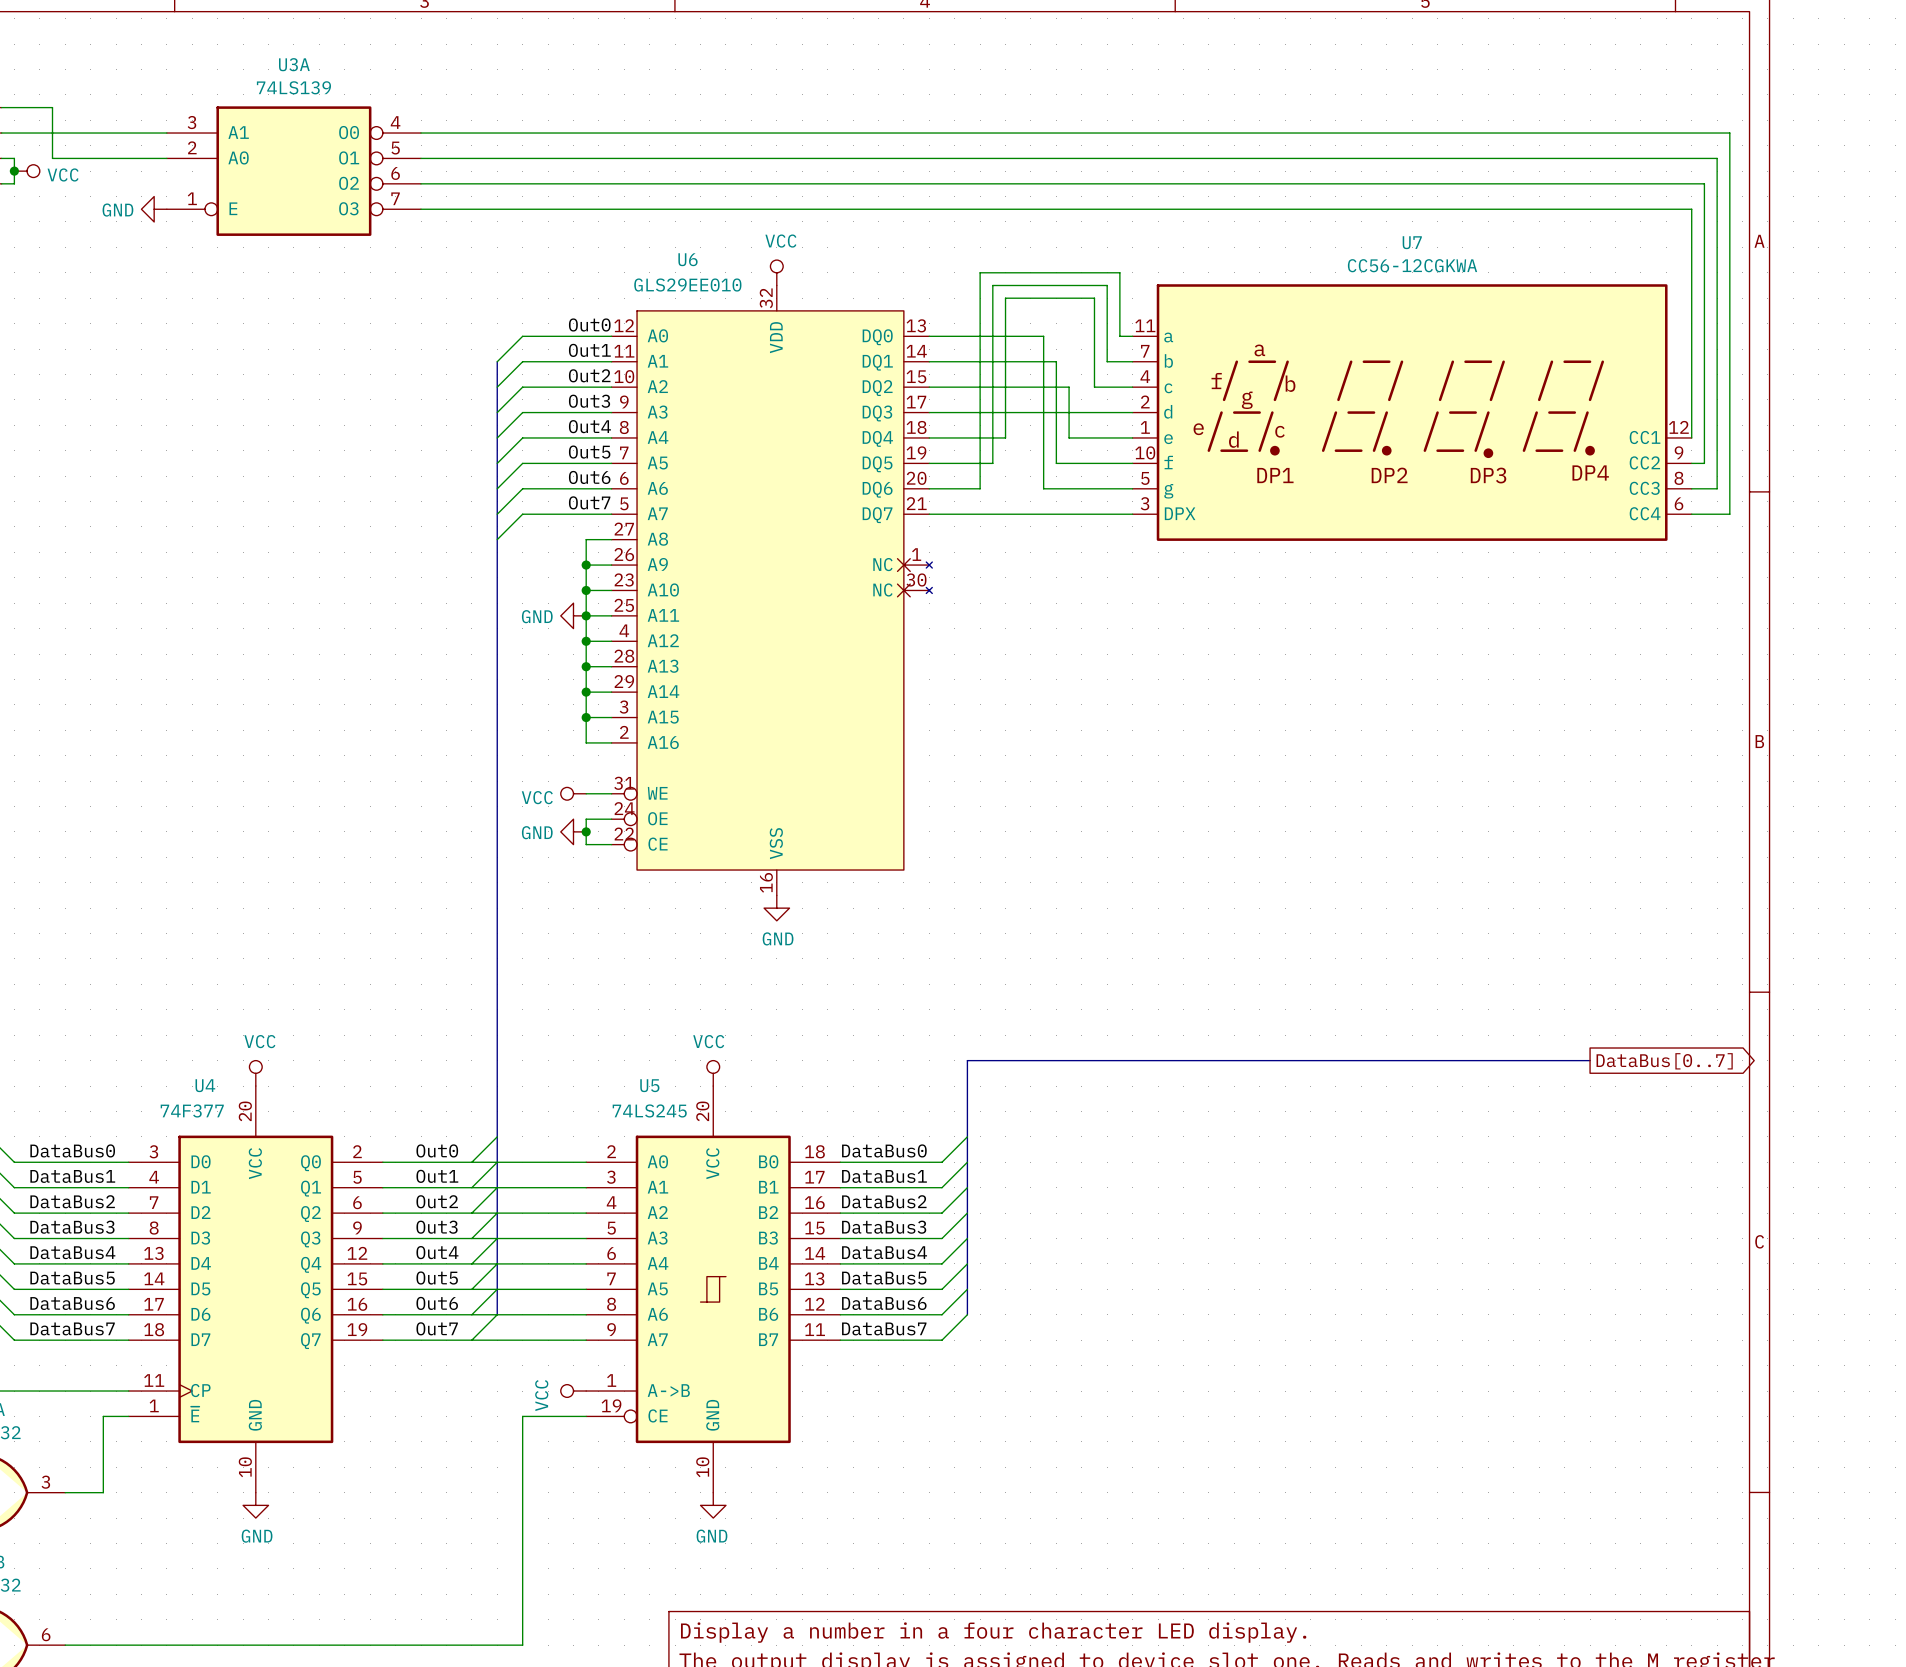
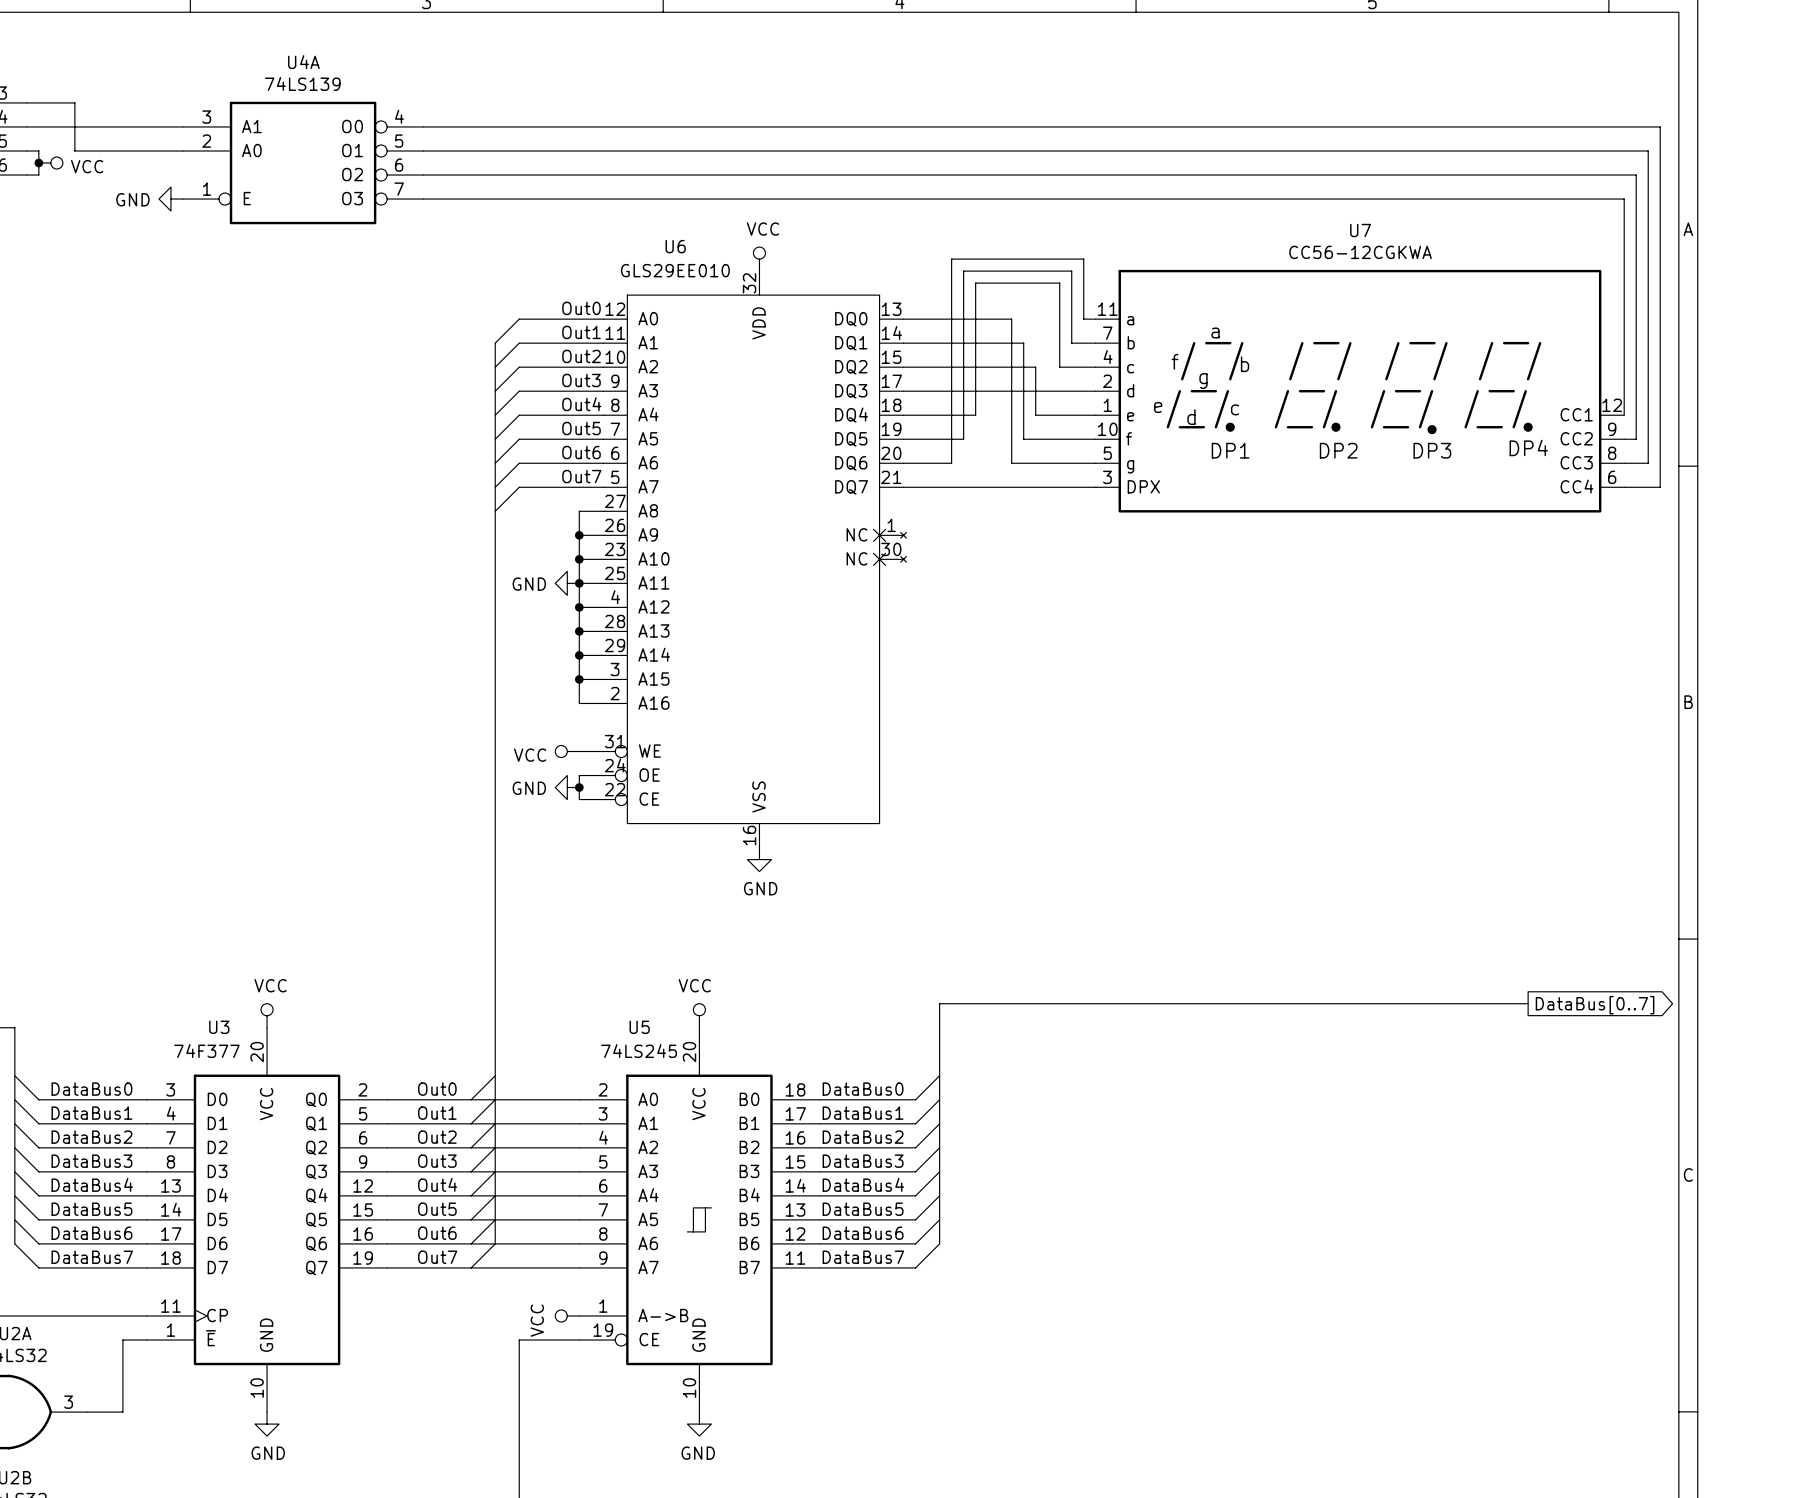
U3A name: U3A (294, 64) -> U4A (303, 62)
U4 name: U4 (205, 1085) -> U3 (219, 1027)

